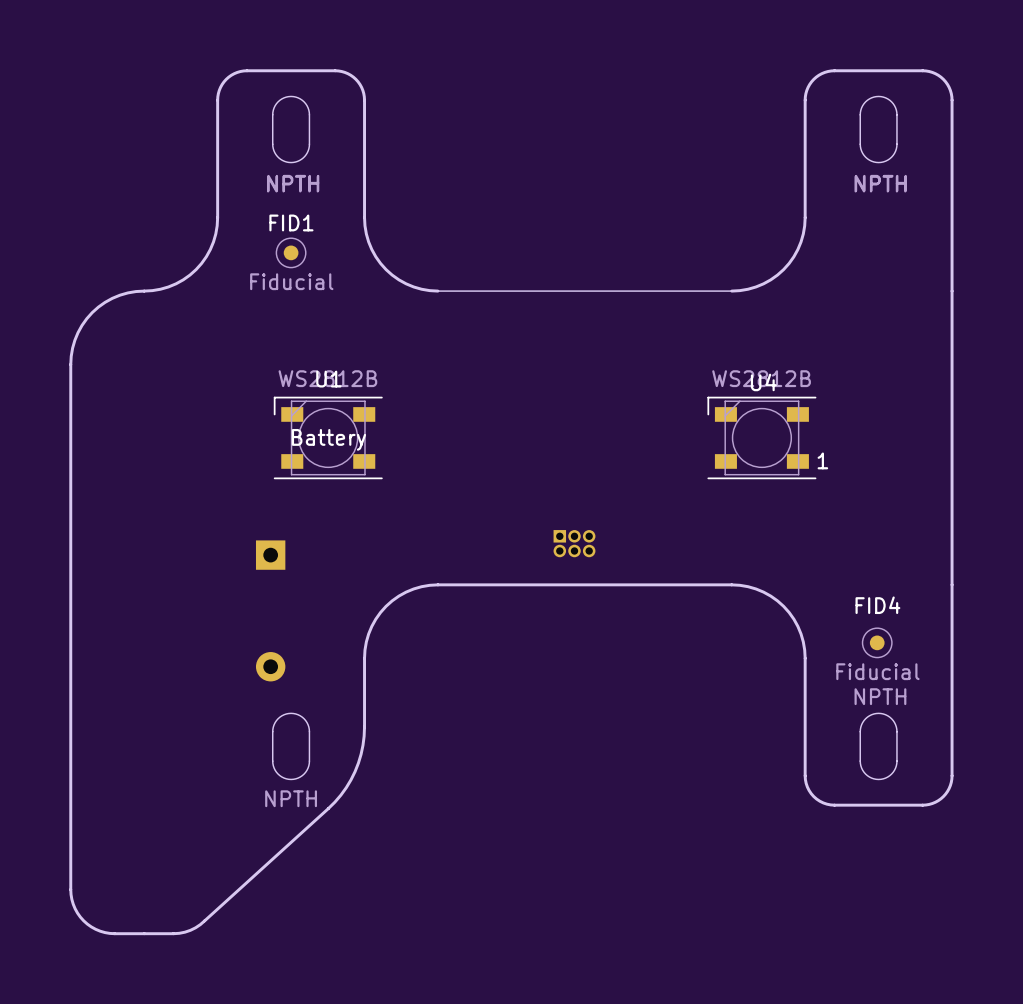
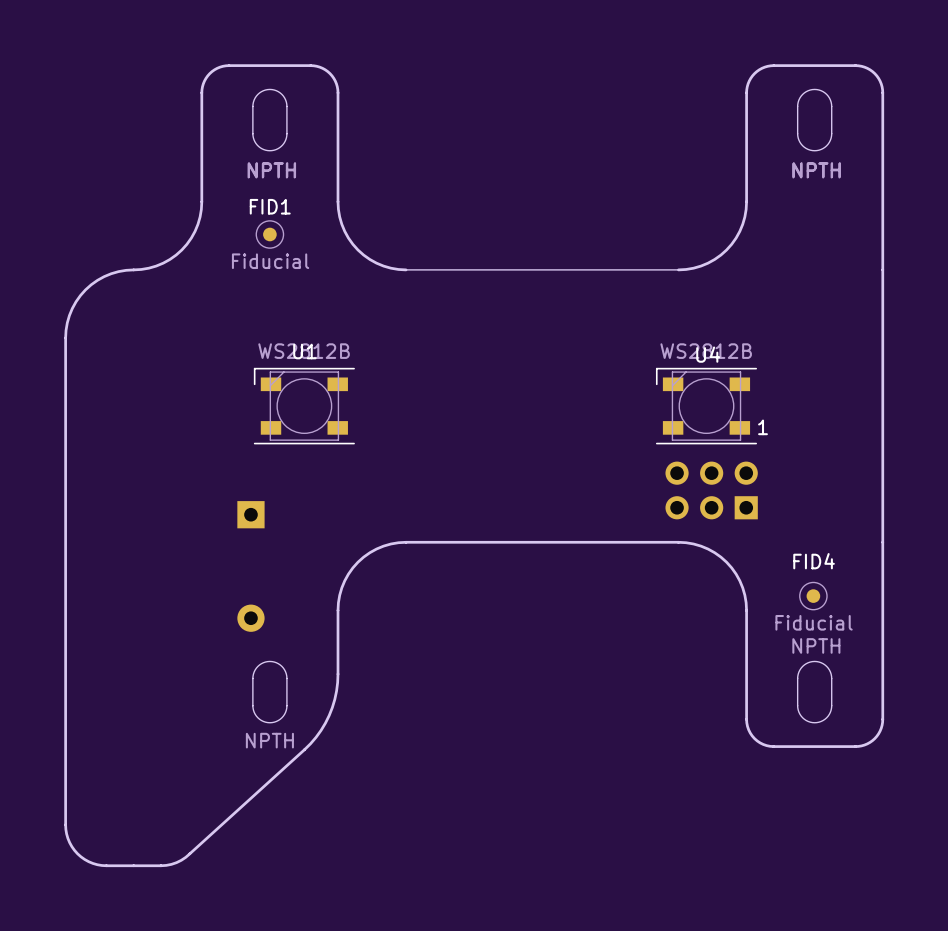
U1 text: Battery (328, 439) -> none
part: none -> (711, 490)
part: (574, 543) -> none

